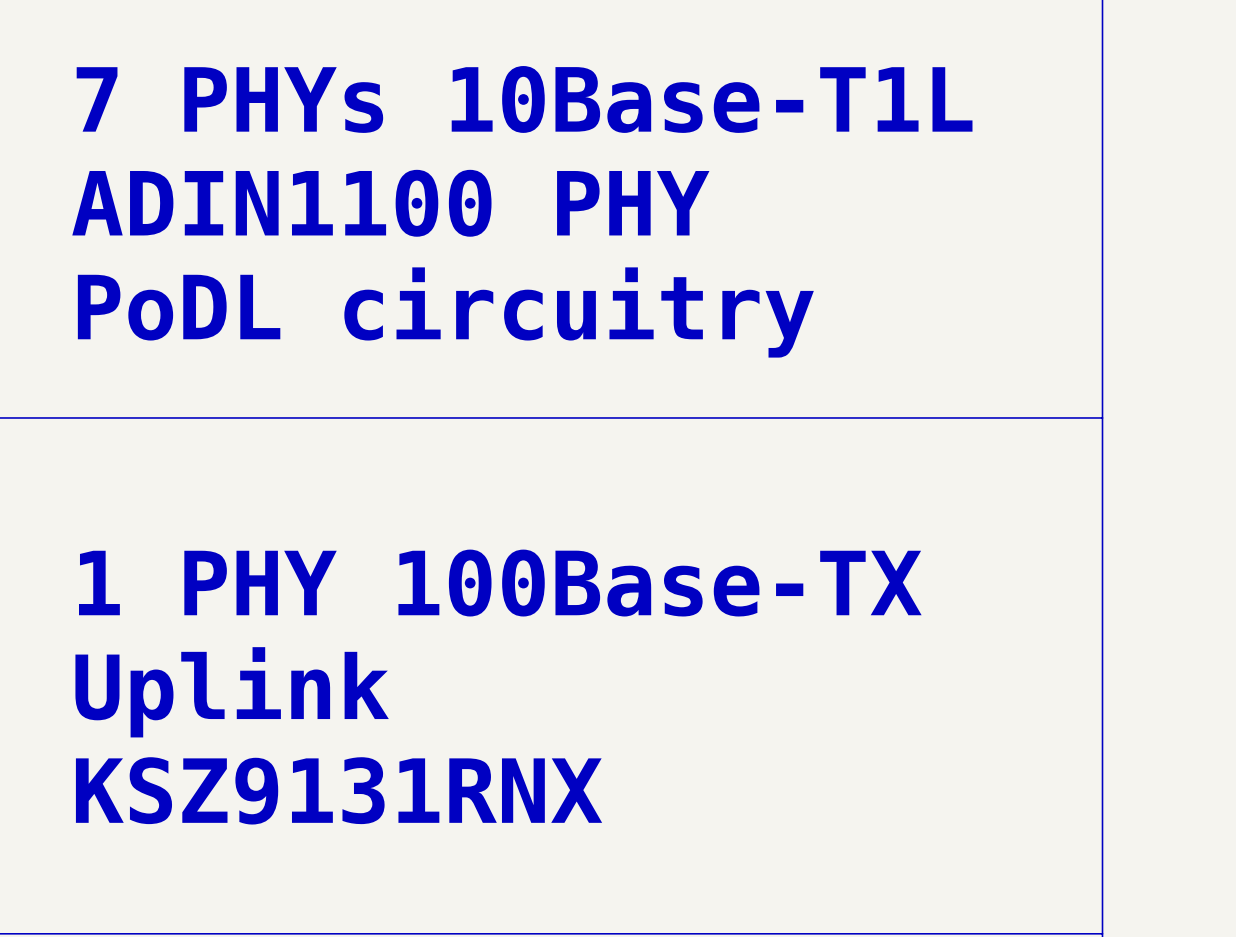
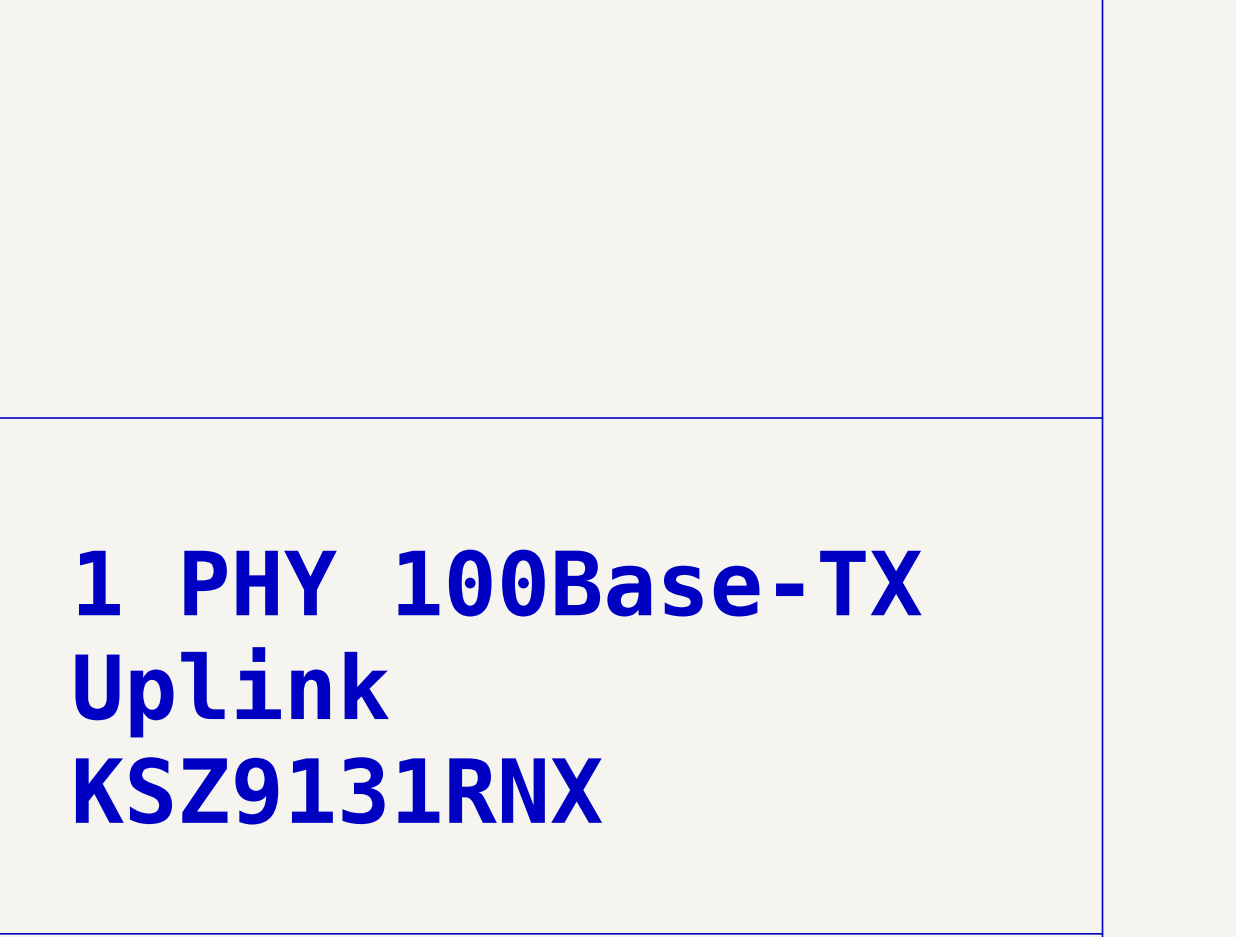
text: 7 PHYs 10Base-T1L (524, 99) -> none
text: ADIN1100 PHY (390, 203) -> none
text: PoDL circuitry (445, 312) -> none

